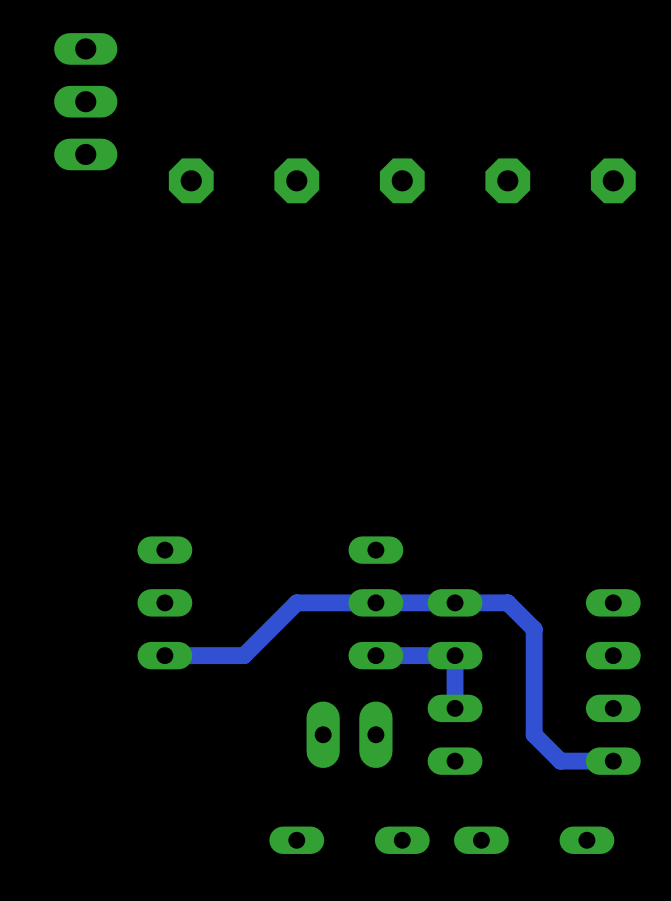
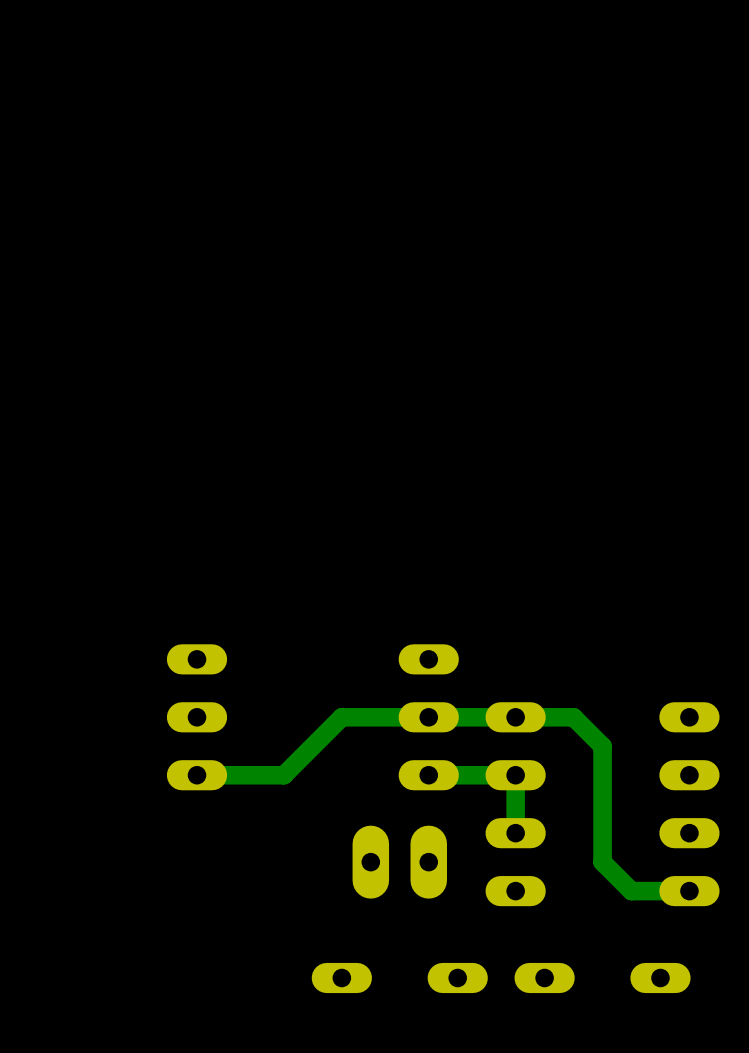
part: (85, 101) -> none
part: (191, 180) -> none
part: (296, 180) -> none
part: (402, 180) -> none
part: (507, 180) -> none
part: (613, 180) -> none

